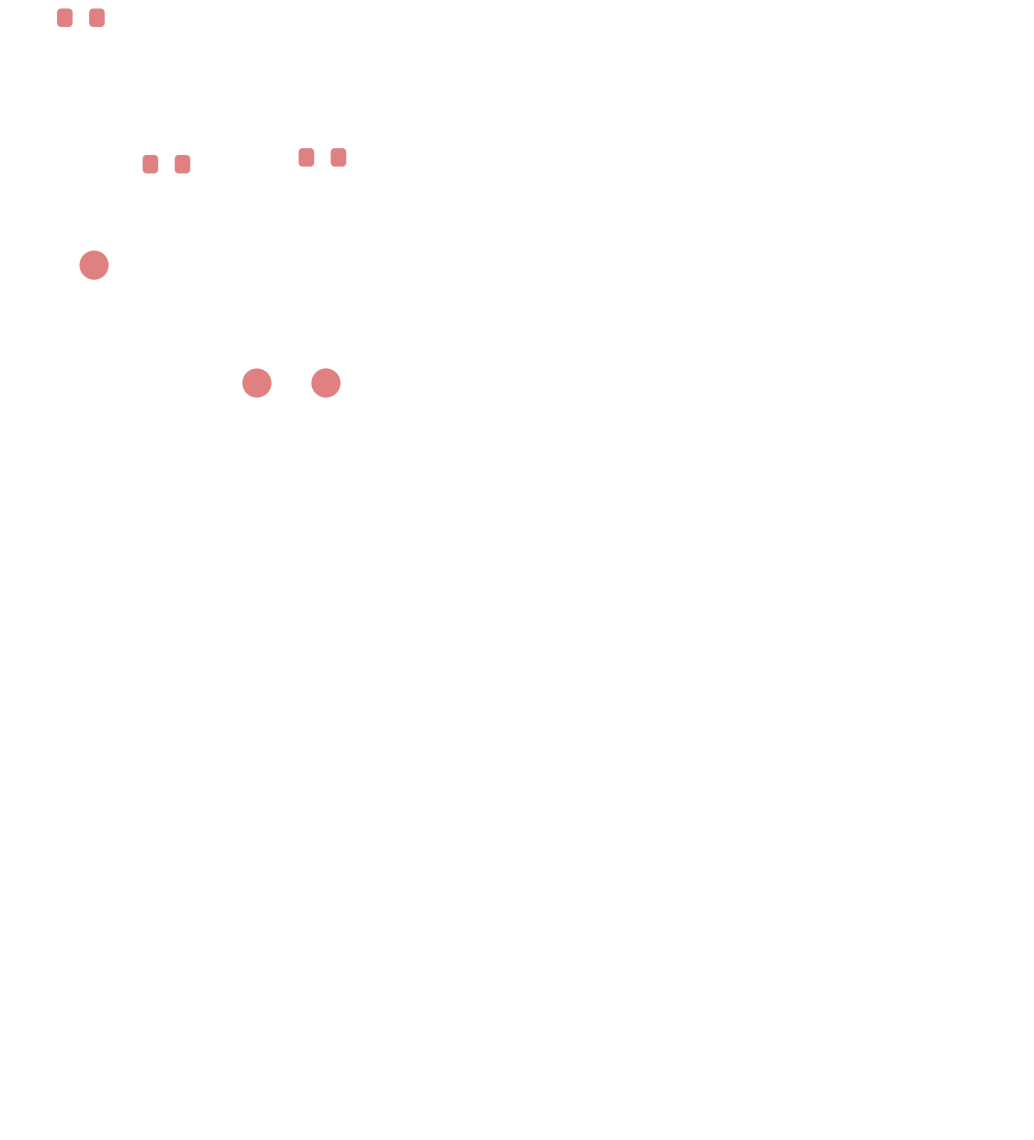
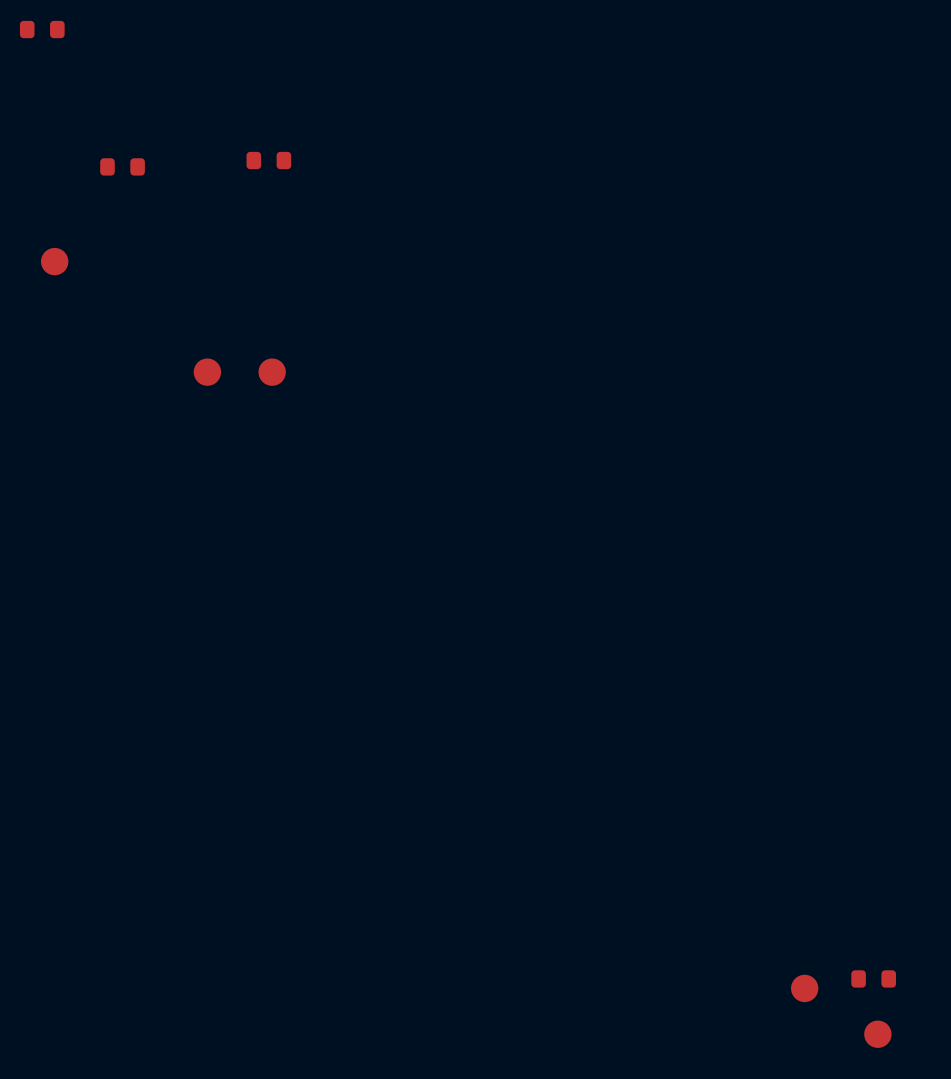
part: none -> (873, 978)
part: none -> (804, 988)
part: none -> (877, 1034)

